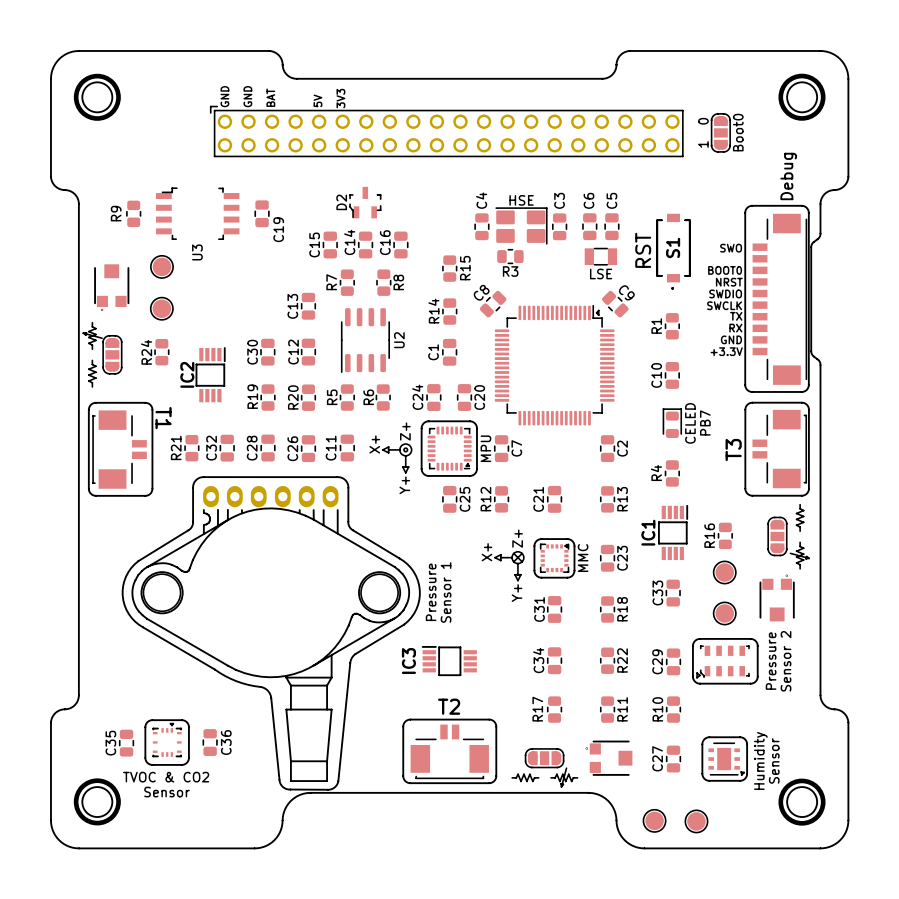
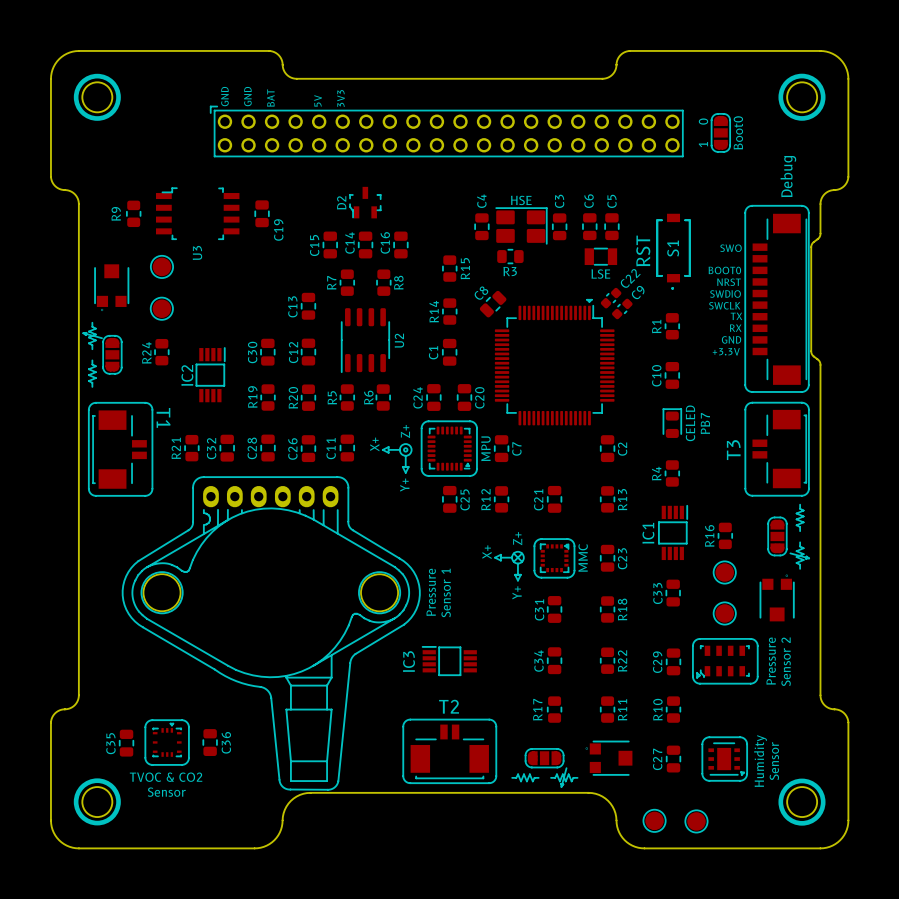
C9 footprint: [601, 290, 629, 318] -> [612, 298, 633, 320]
C22: none -> (611, 298)
line: none -> (587, 299) (591, 299) (589, 301) (587, 299)
line: (598, 310) (598, 315) (596, 312) (598, 310) -> none

